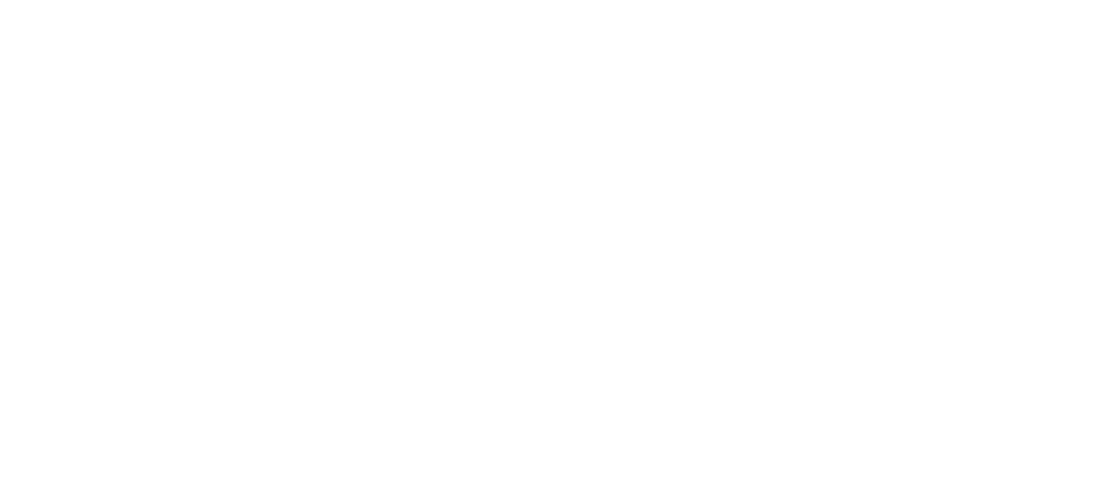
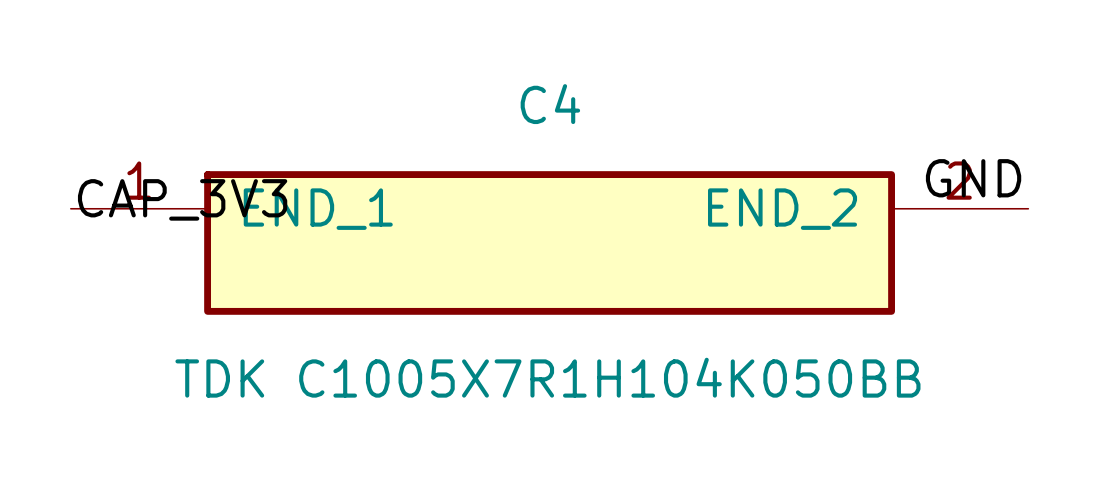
label: none -> GND (973, 178)
label: none -> CAP_3V3 (182, 199)
C4: none -> TDK C1005X7R1H104K050BB (549, 242)

